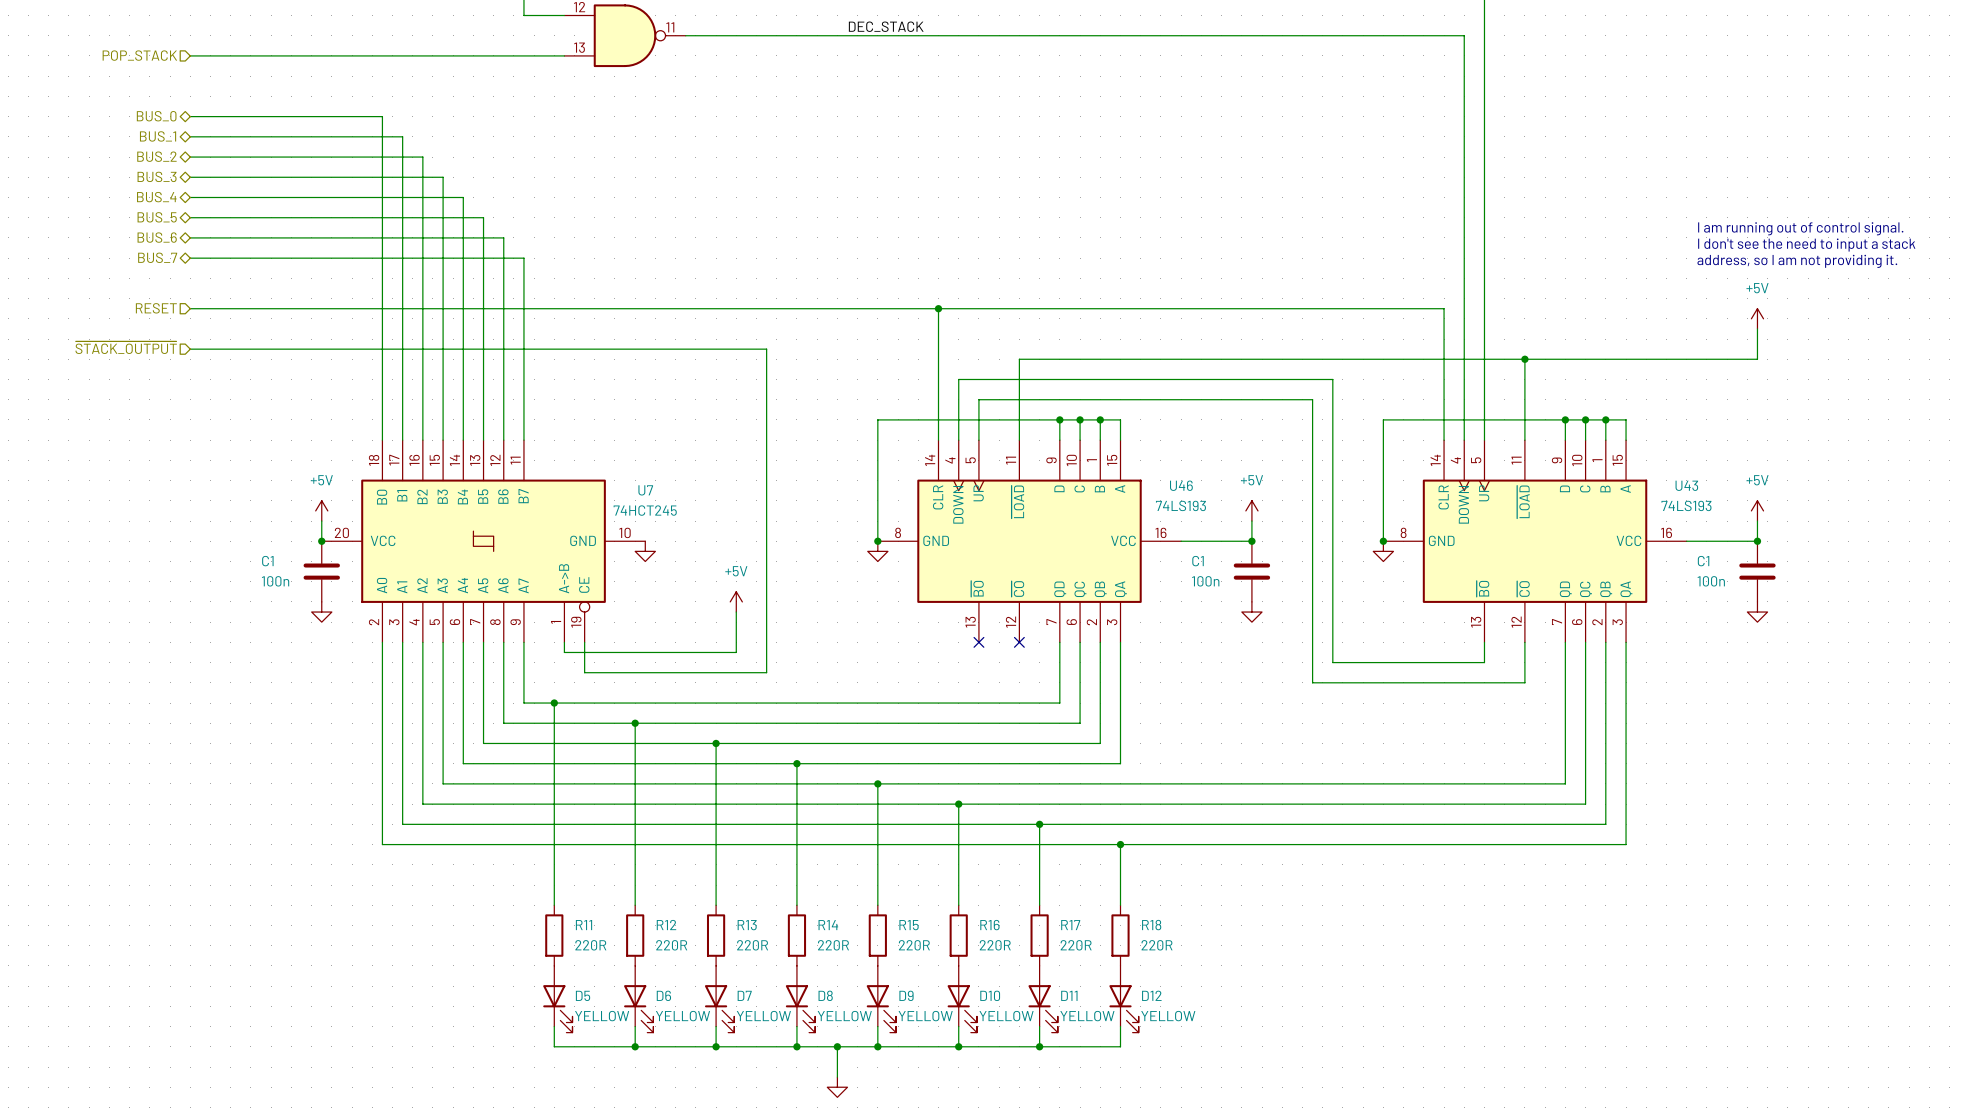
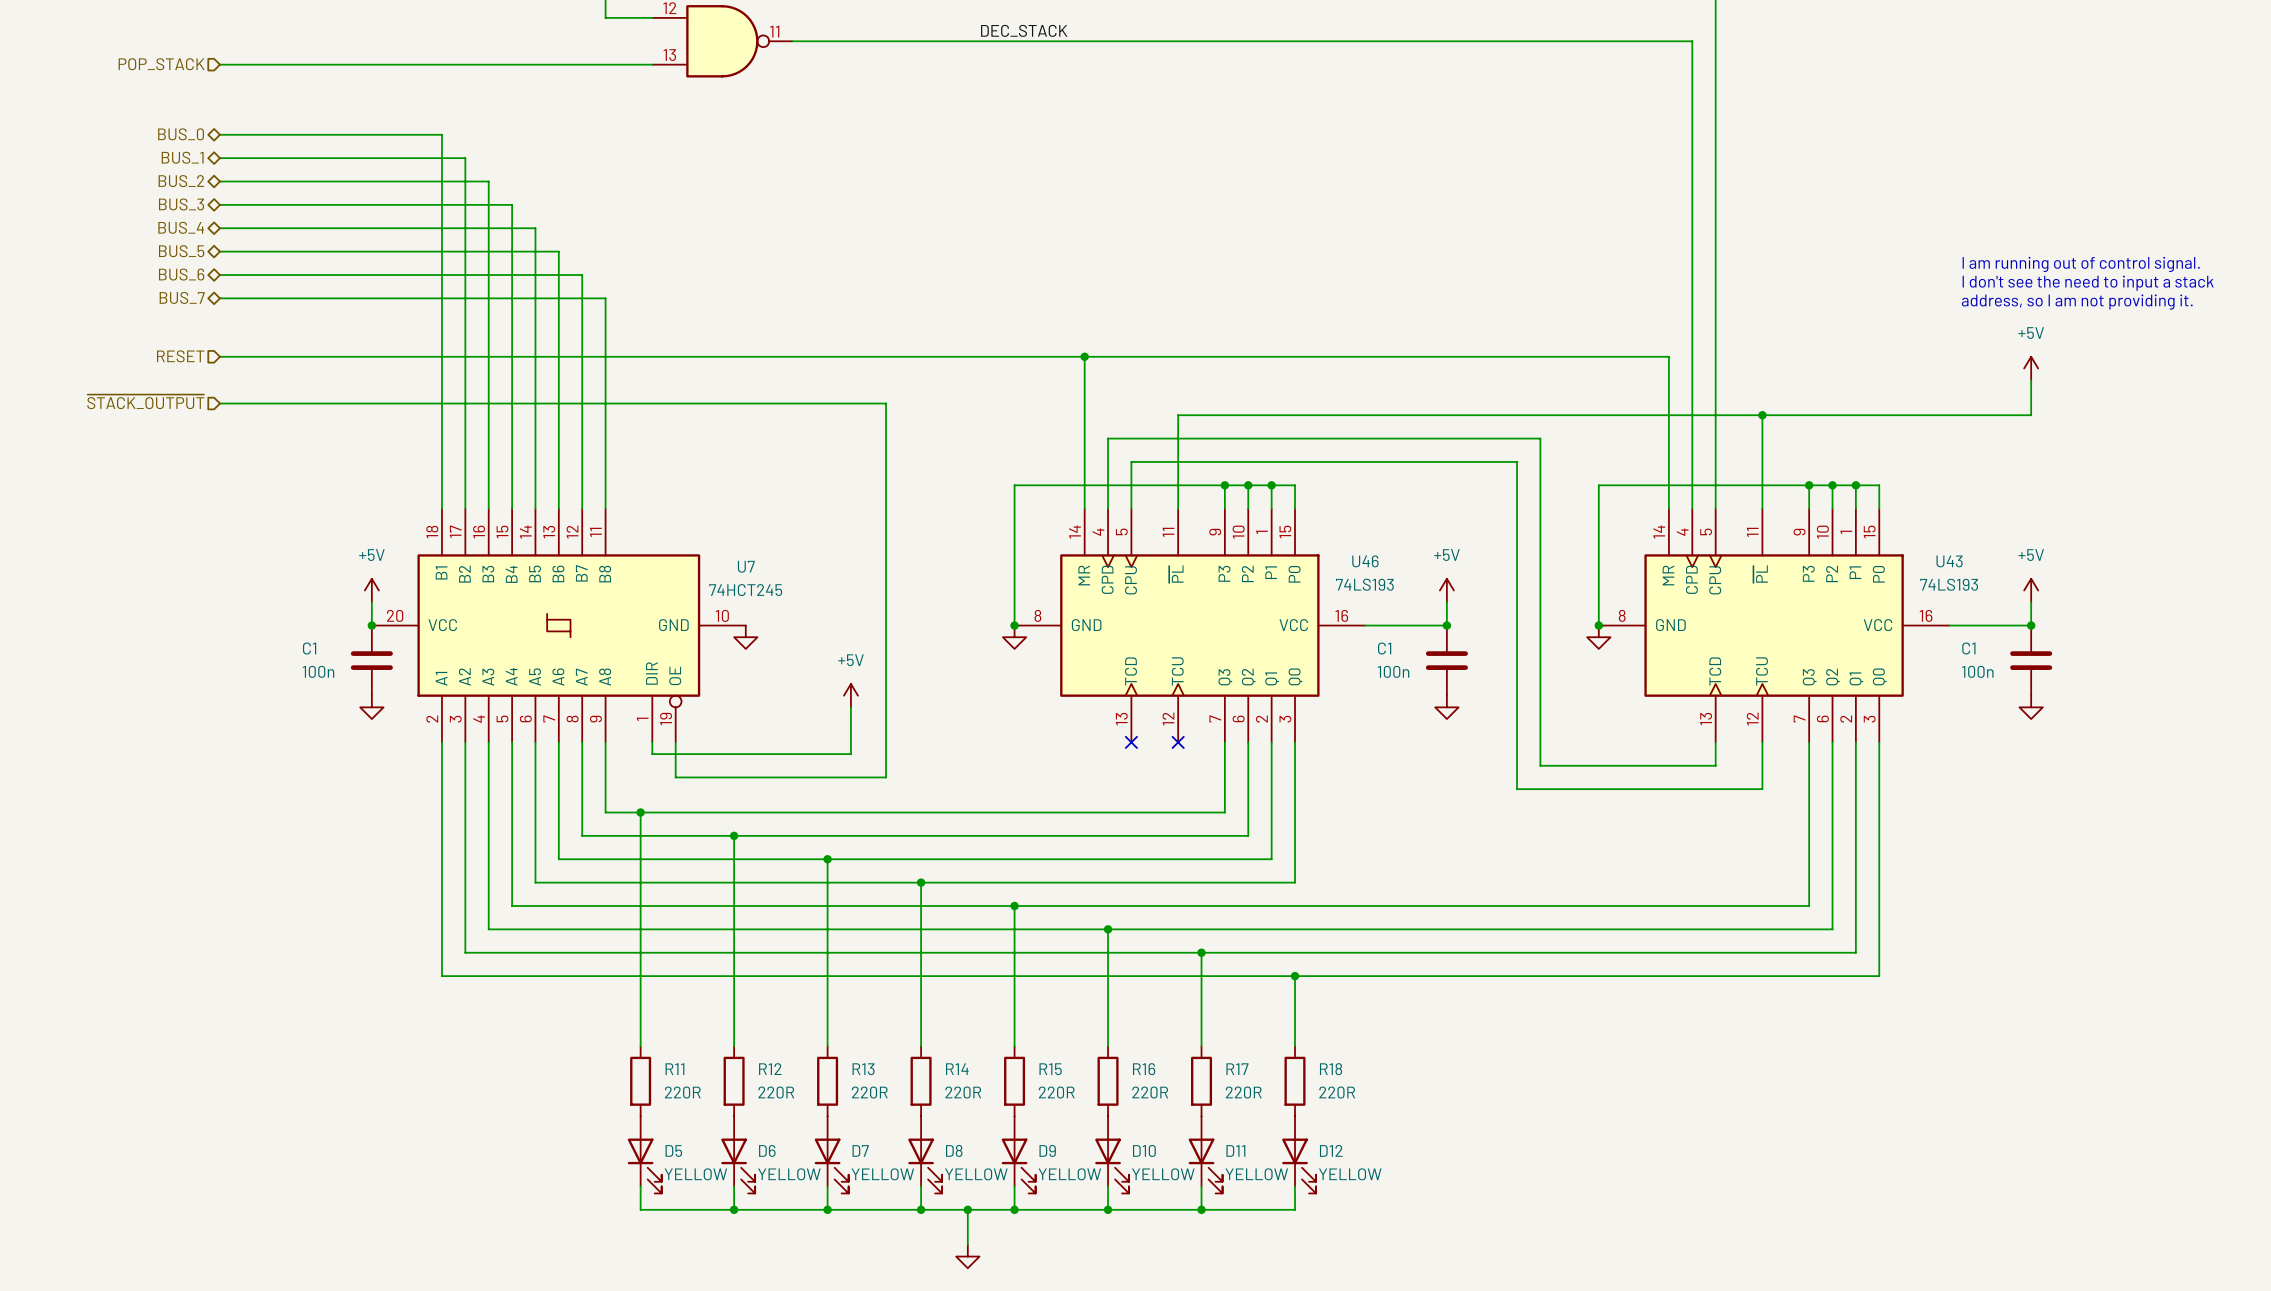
U7 symbol: [321, 440, 646, 643] -> [371, 508, 746, 743]
U46 symbol: [877, 440, 1182, 643] -> [1014, 508, 1366, 743]
U43 symbol: [1383, 440, 1687, 643] -> [1598, 508, 1950, 743]

